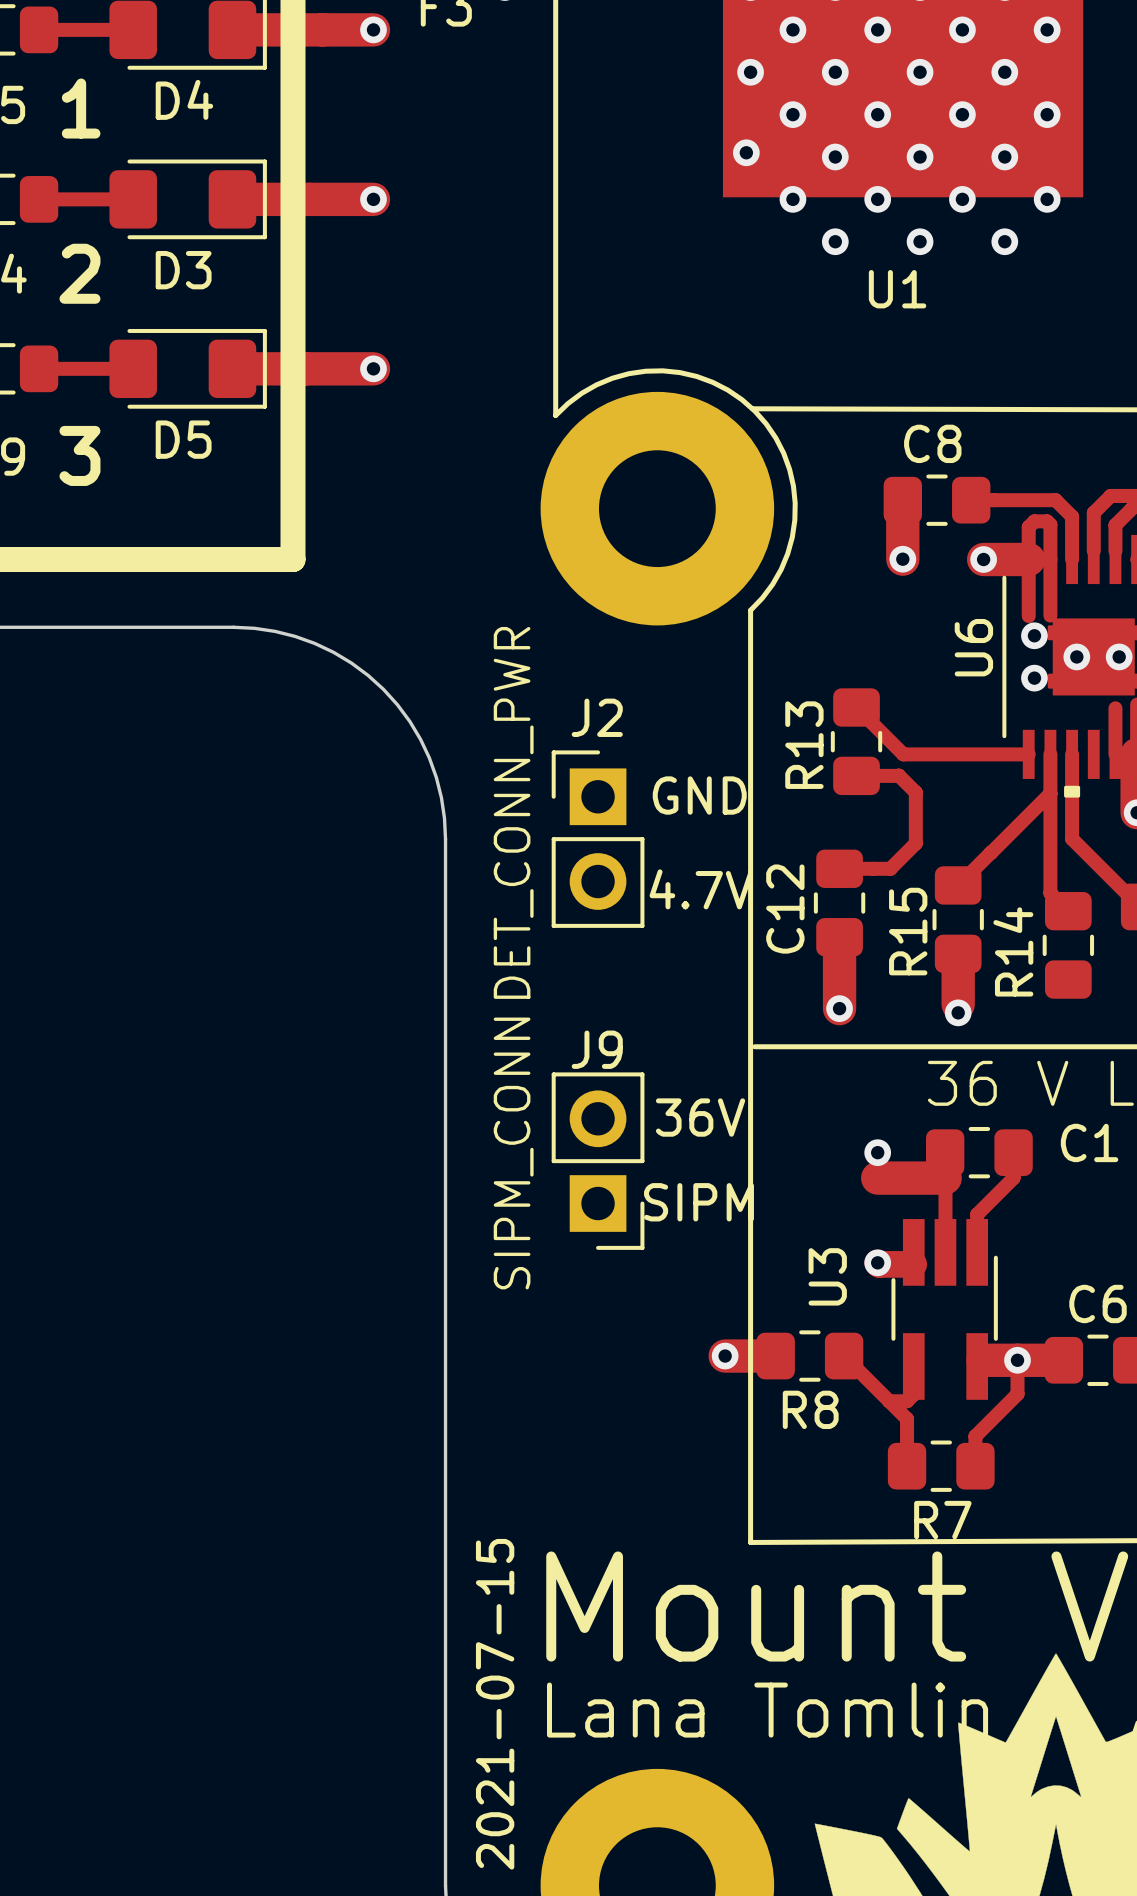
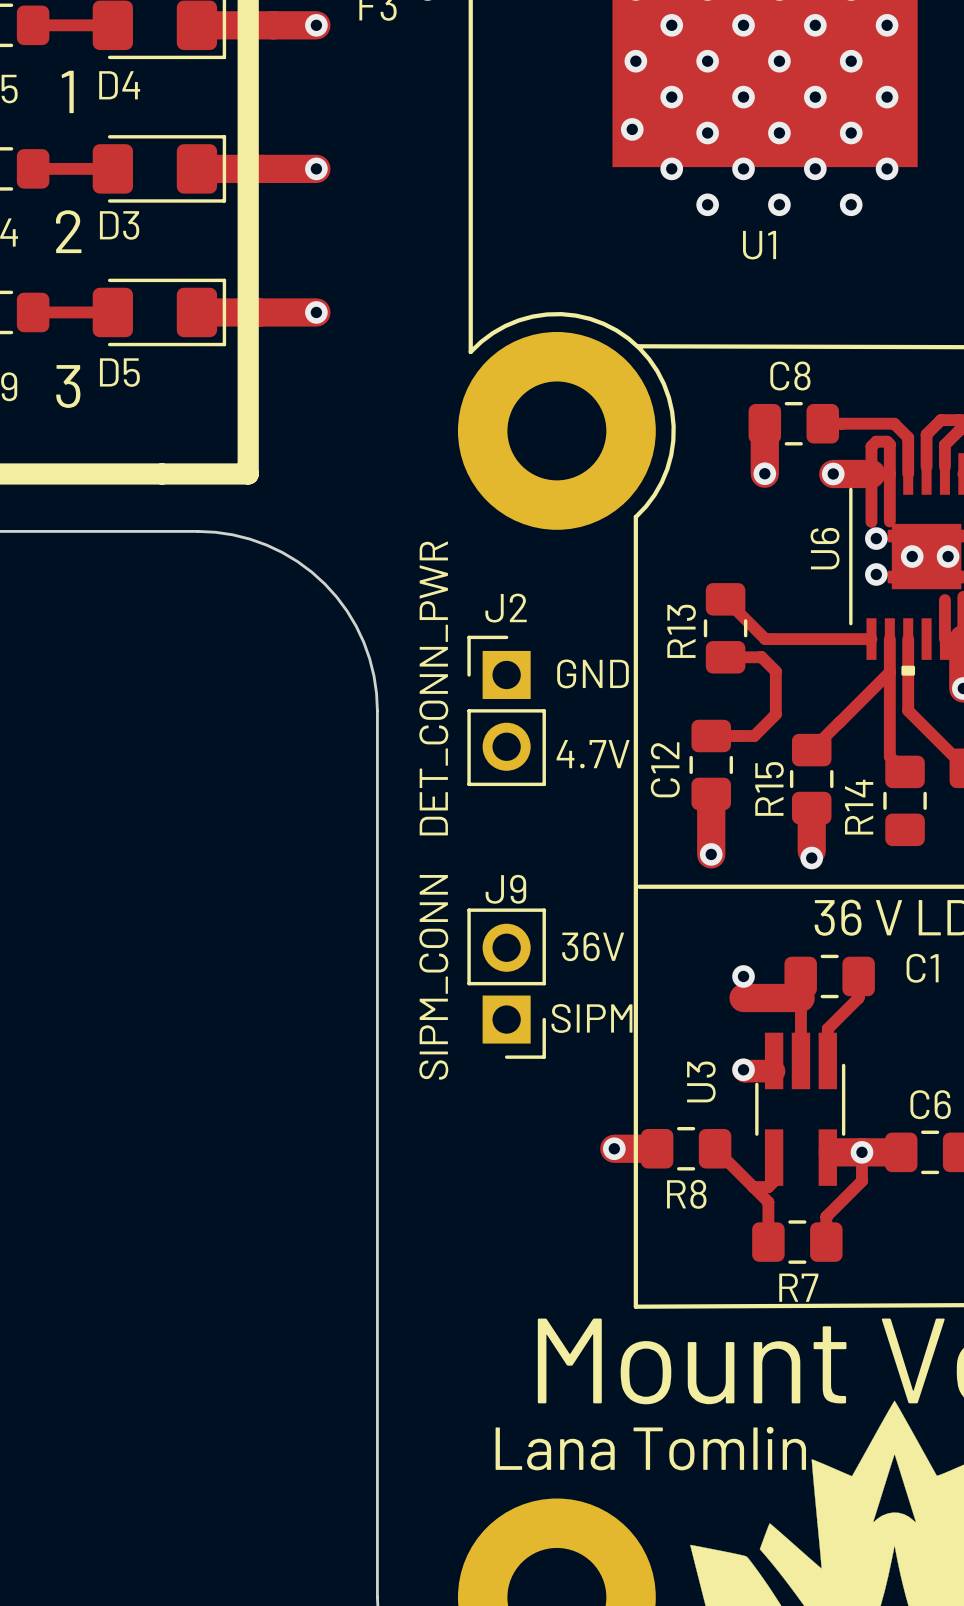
D4 name position: D4 (184, 99) -> D4 (119, 85)
D3 name position: D3 (183, 270) -> D3 (119, 225)
D5 name position: D5 (183, 439) -> D5 (119, 372)
text: 2021-07-15 (495, 1704) -> none

